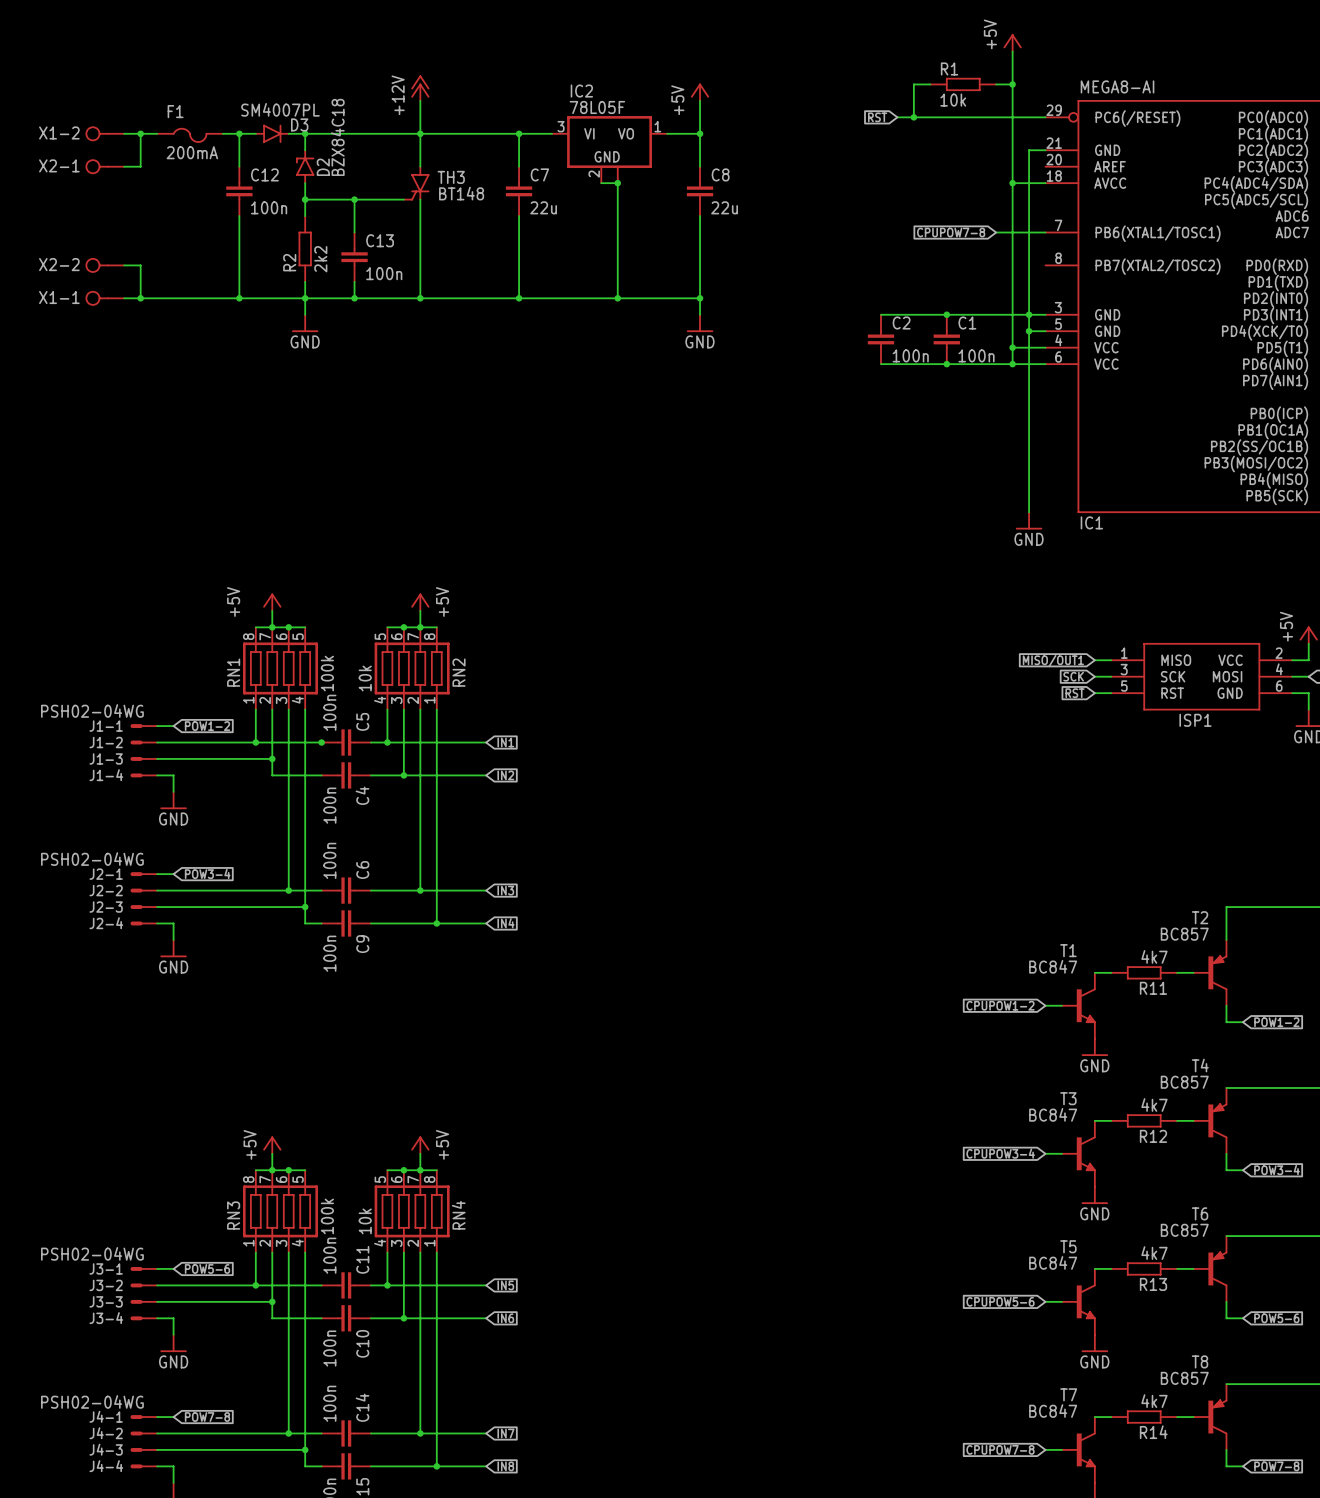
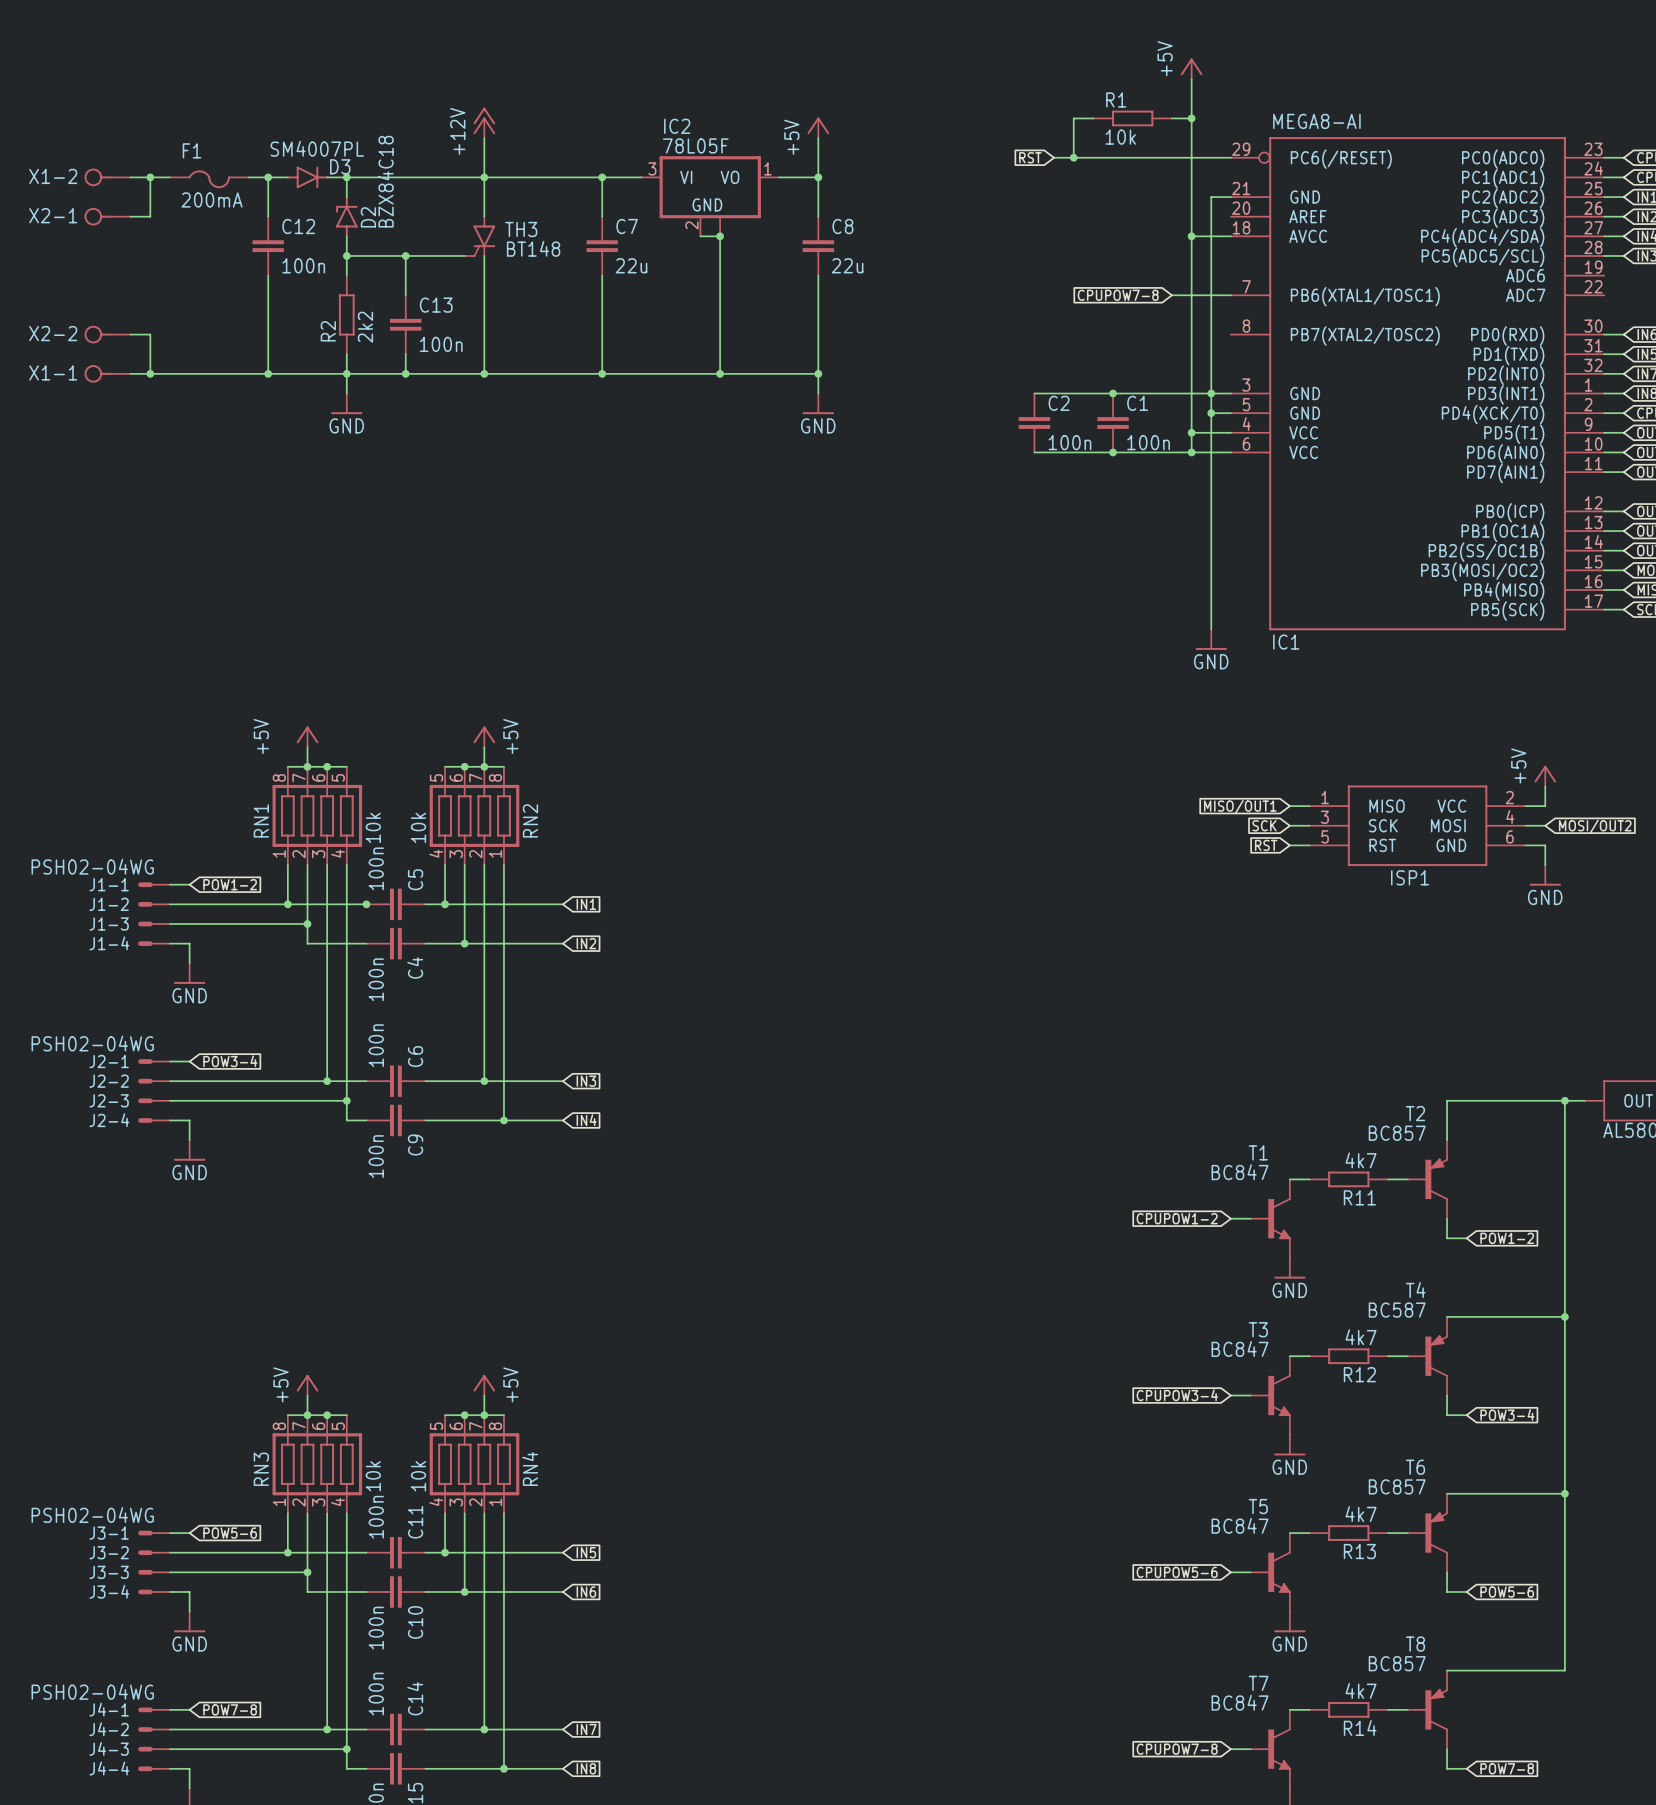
RN1 value: 100k (327, 673) -> 10k (373, 827)
T4 value: BC857 (1184, 1082) -> BC587 (1397, 1310)
RN3 value: 100k (327, 1216) -> 10k (373, 1476)

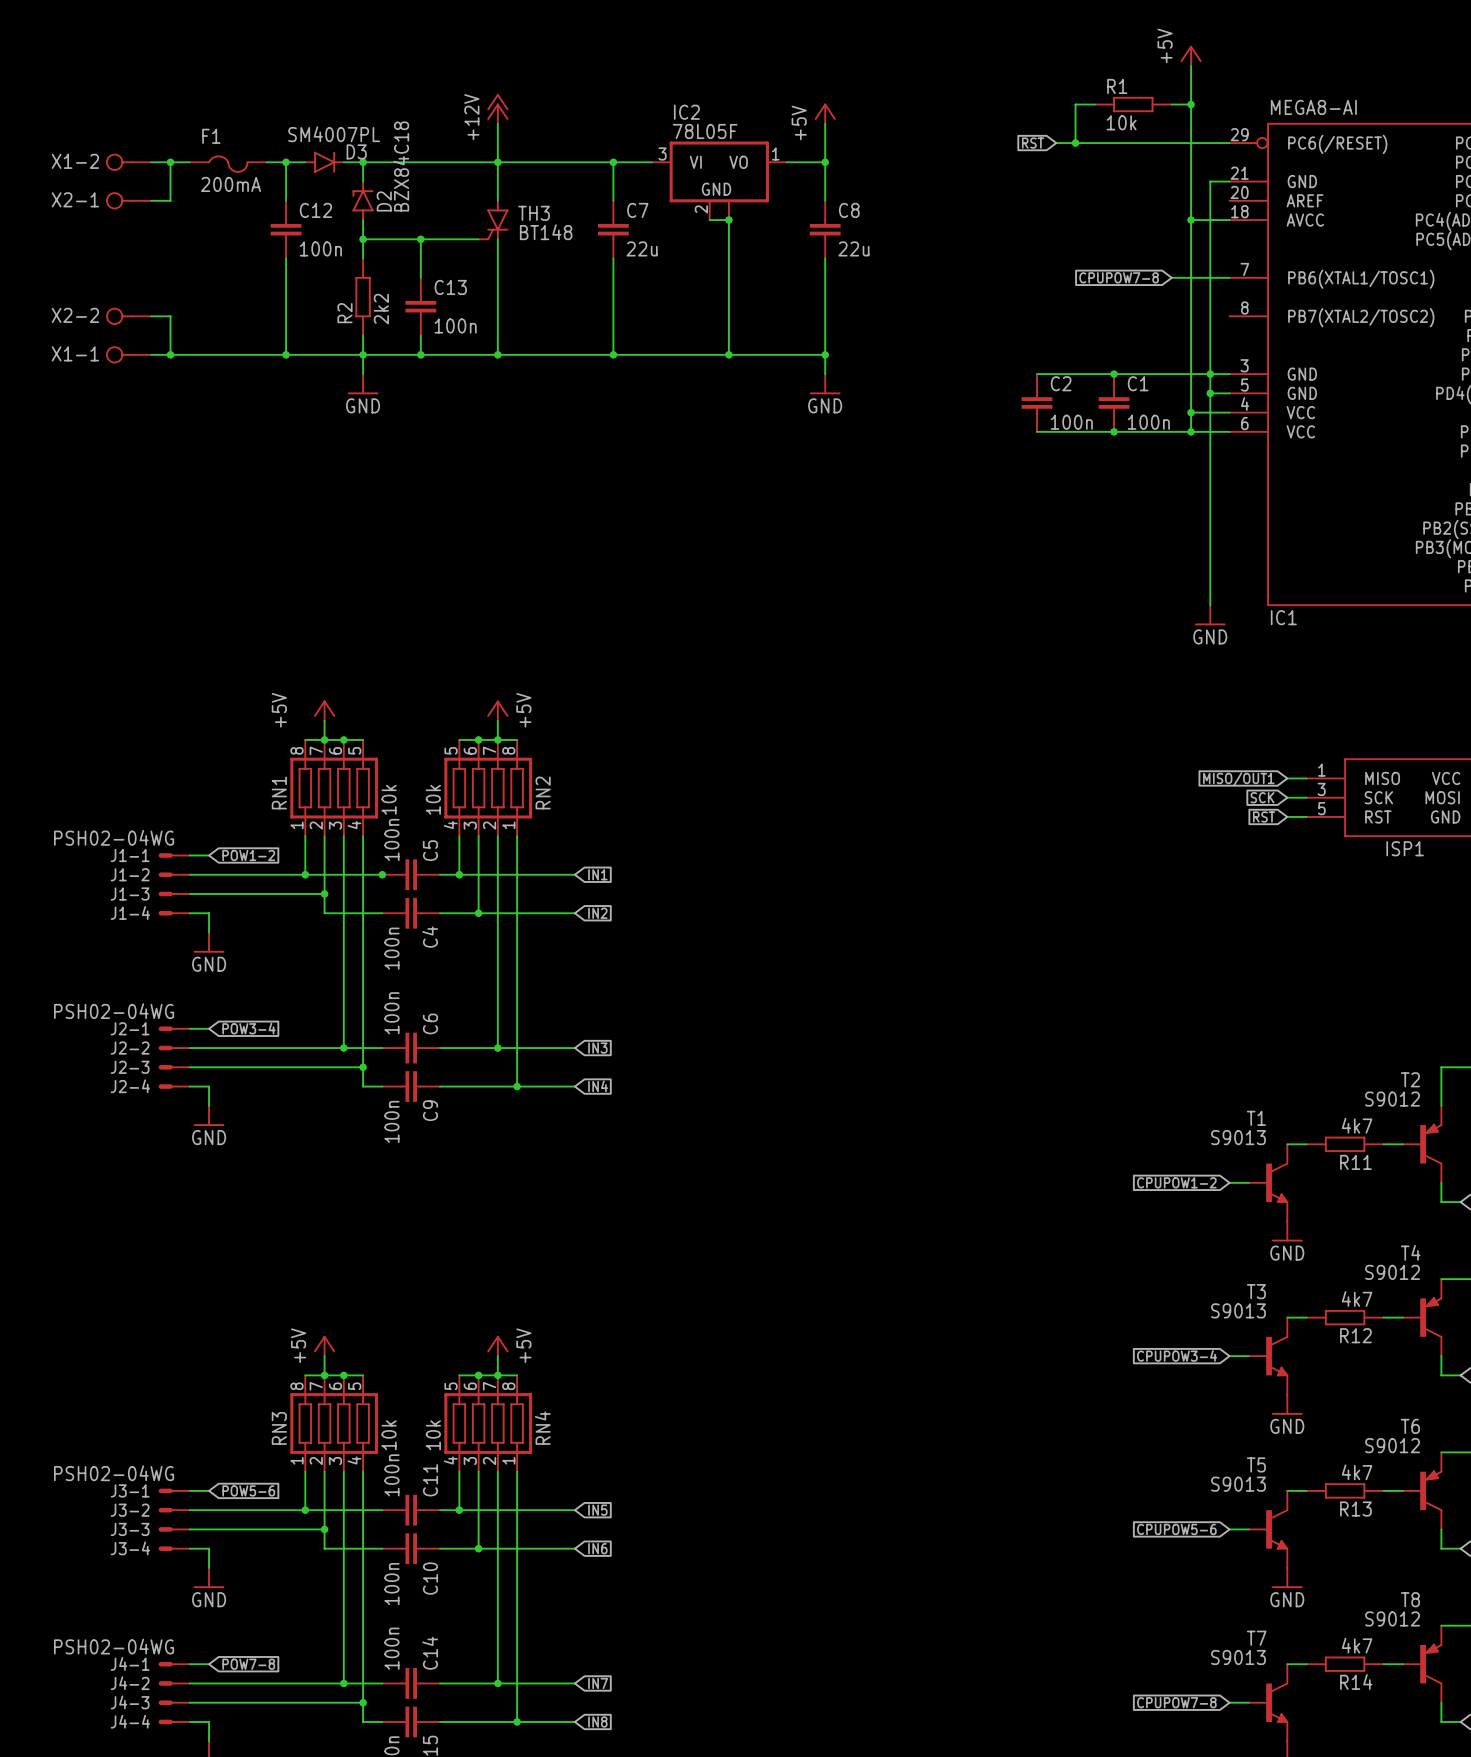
T2 value: BC857 (1397, 1133) -> S9012 (1392, 1099)
T1 value: BC847 (1240, 1172) -> S9013 (1238, 1137)
T4 value: BC587 (1397, 1310) -> S9012 (1392, 1272)
T3 value: BC847 (1240, 1349) -> S9013 (1238, 1310)
T6 value: BC857 (1397, 1486) -> S9012 (1392, 1445)
T5 value: BC847 (1240, 1525) -> S9013 (1238, 1484)
T8 value: BC857 (1397, 1663) -> S9012 (1392, 1618)
T7 value: BC847 (1240, 1702) -> S9013 (1238, 1657)

